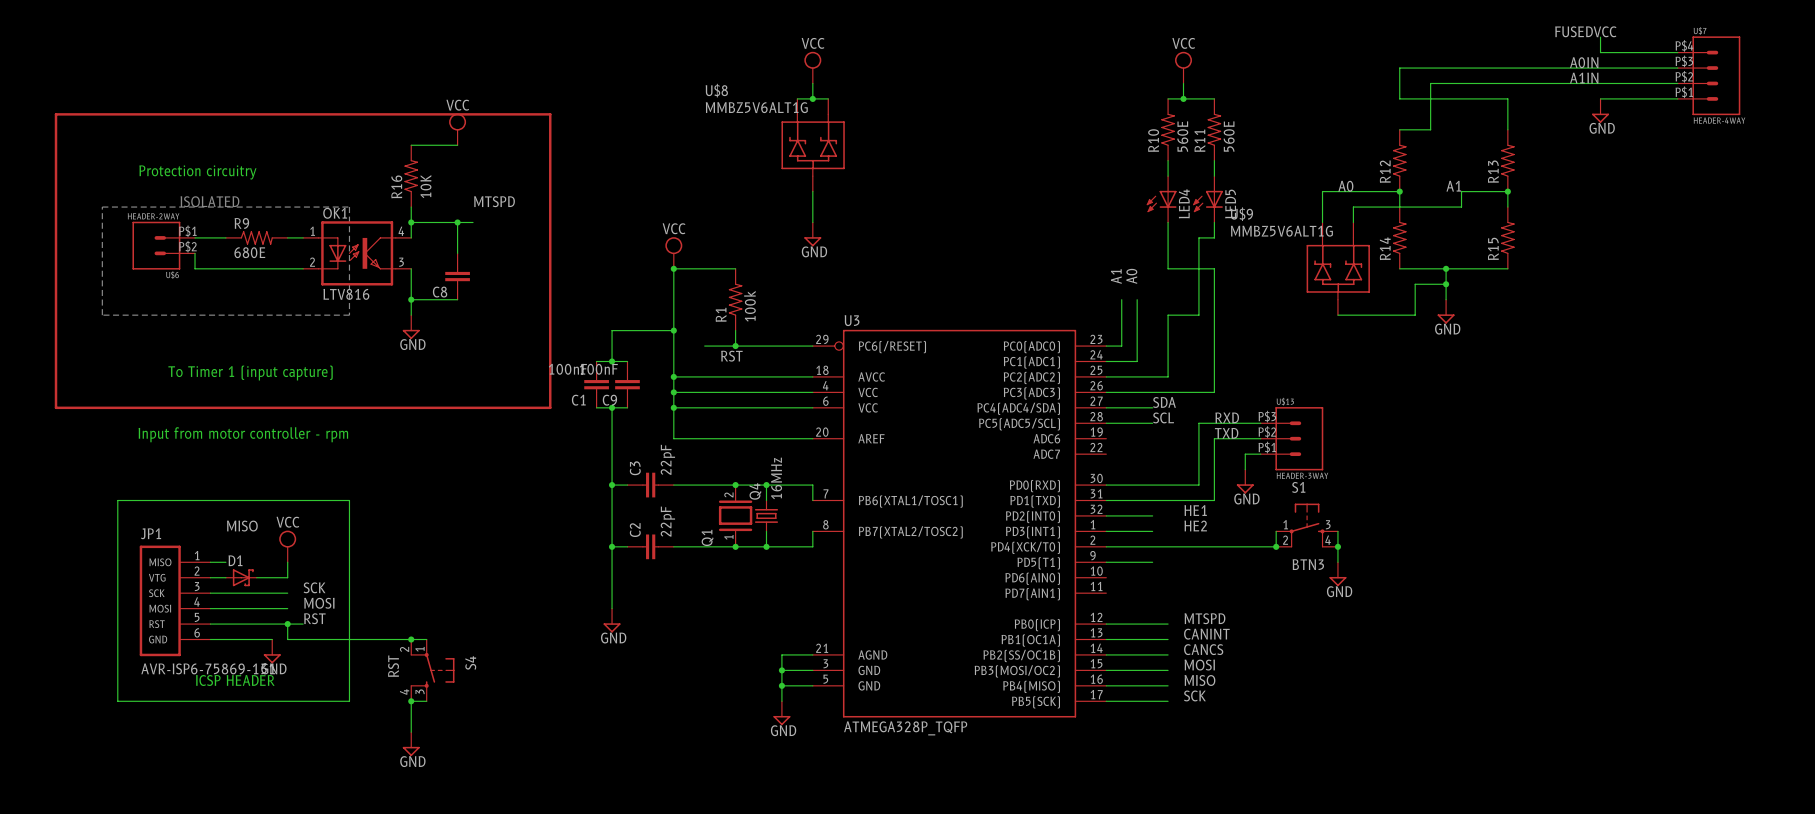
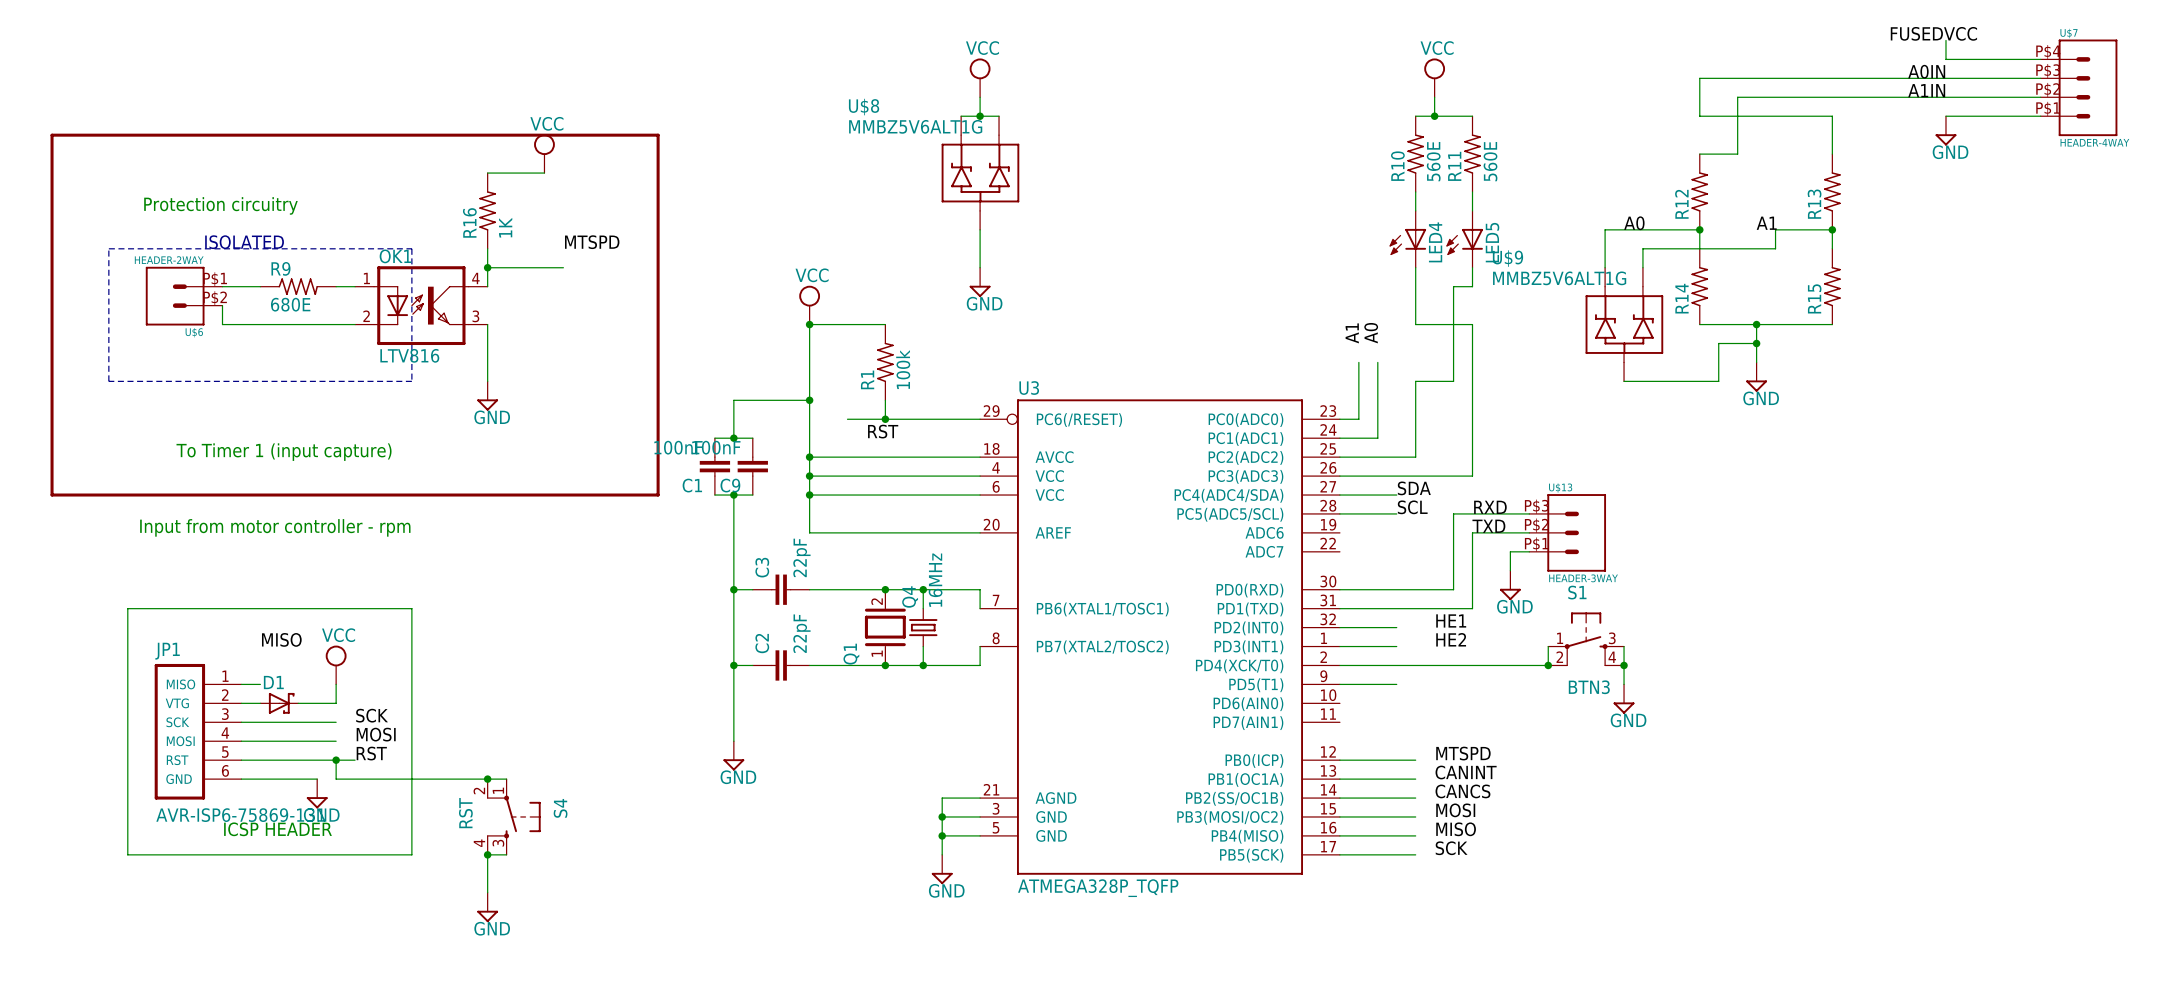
R16 value: 10K (425, 186) -> 1K (505, 227)
wire: (457, 222) (457, 253) -> none
junction: (457, 222) -> none
C8: (457, 276) -> none
wire: (411, 299) (457, 299) -> none
junction: (411, 299) -> none

